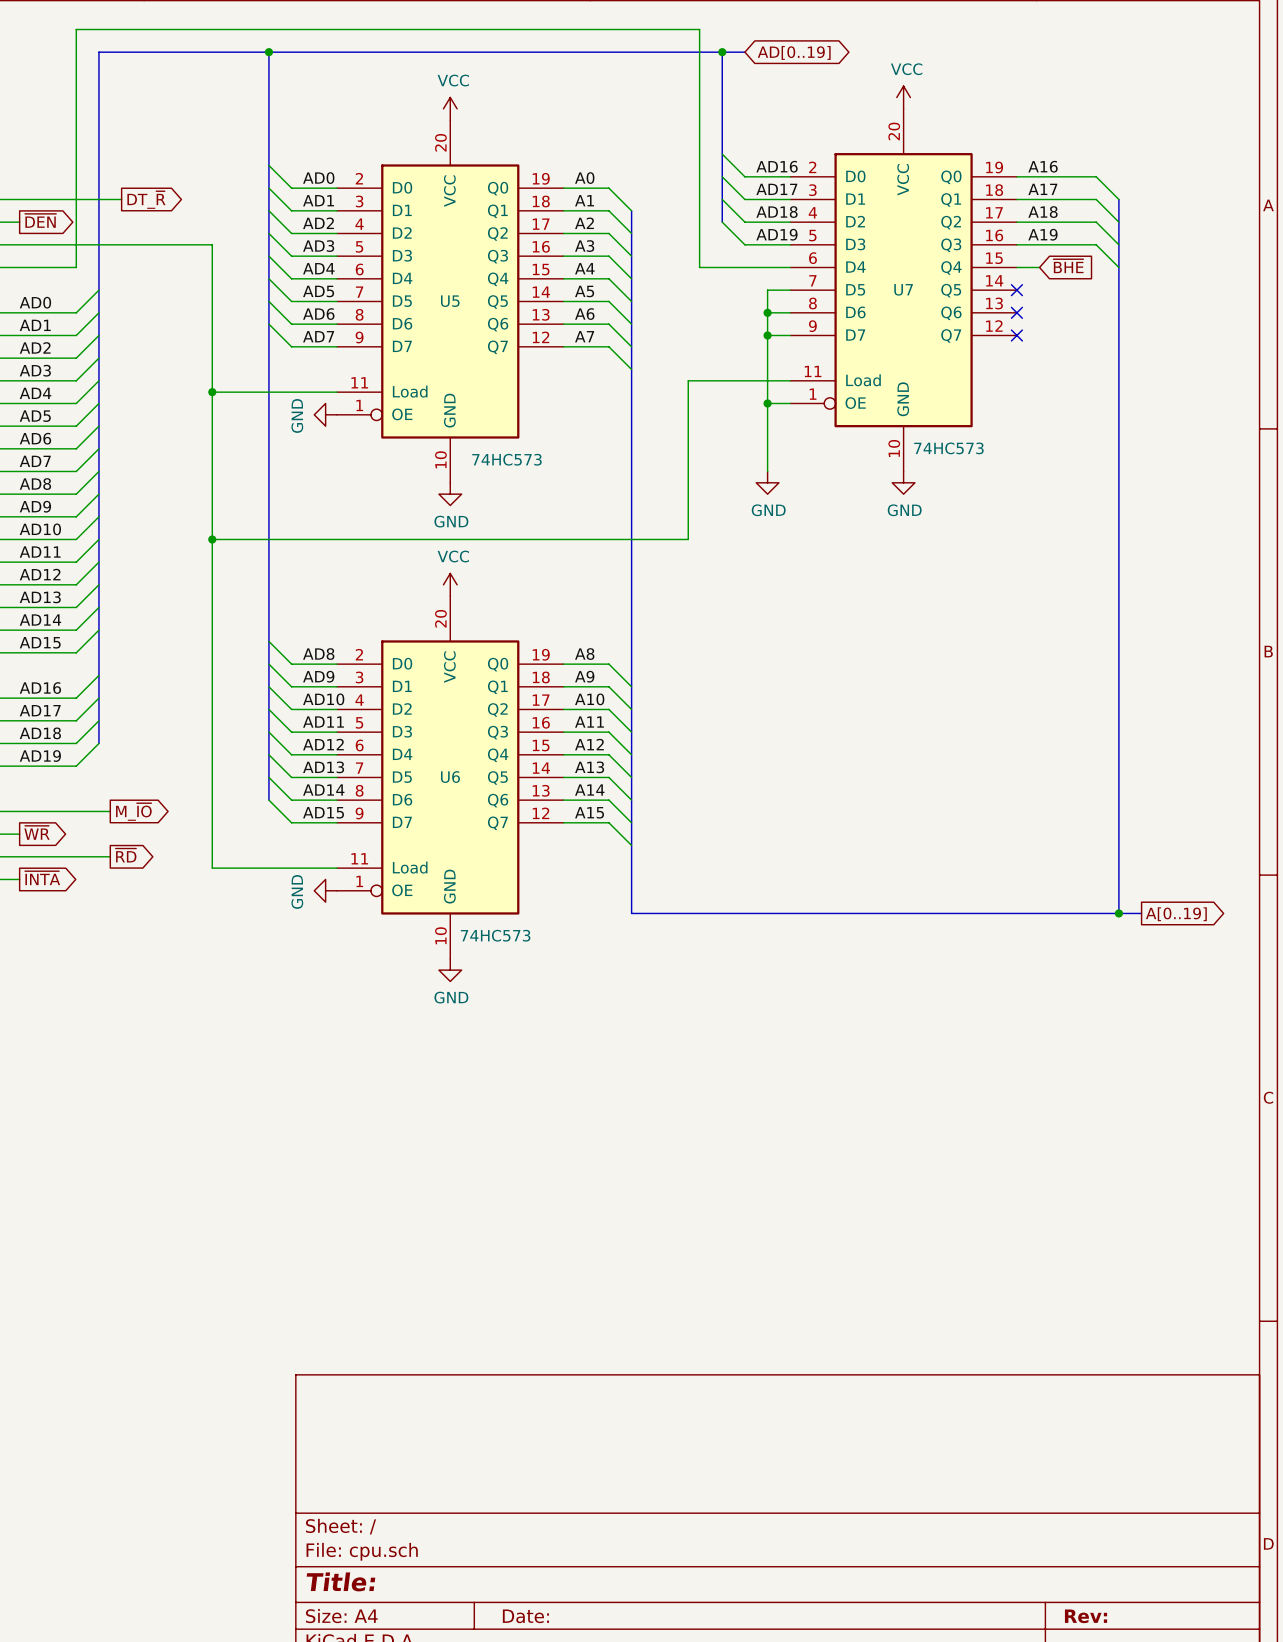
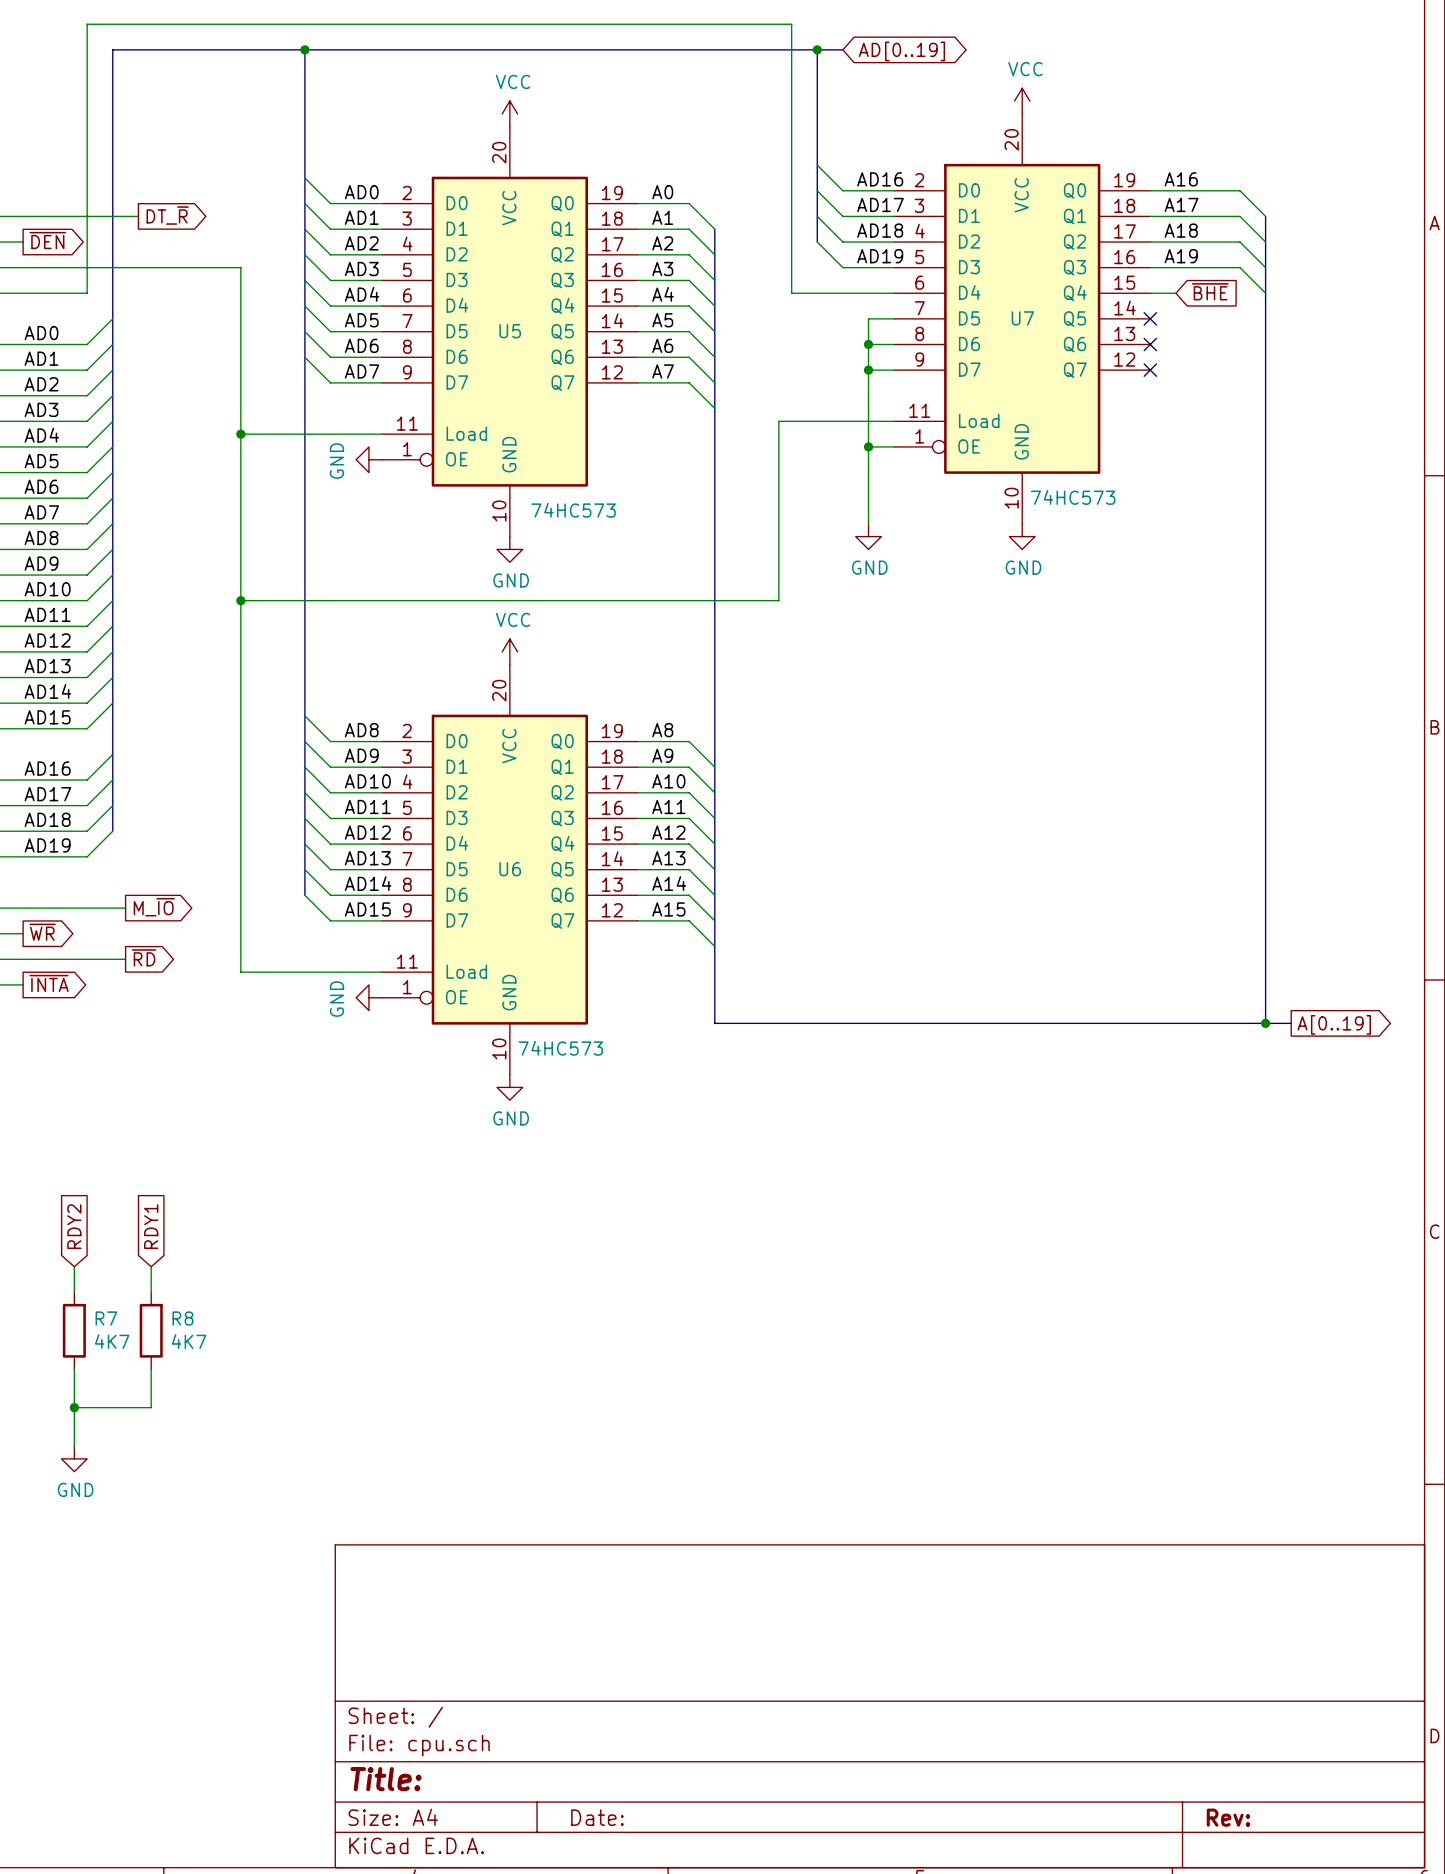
global label: none -> RDY2 (74, 1226)
global label: none -> RDY1 (151, 1226)
wire: none -> (74, 1266) (74, 1292)
wire: none -> (151, 1266) (151, 1292)
R7: none -> 4K7 (74, 1330)
R8: none -> 4K7 (151, 1330)
wire: none -> (74, 1369) (74, 1446)
wire: none -> (151, 1369) (151, 1407) (74, 1407)
junction: none -> (74, 1407)
power symbol: none -> GND (74, 1458)

